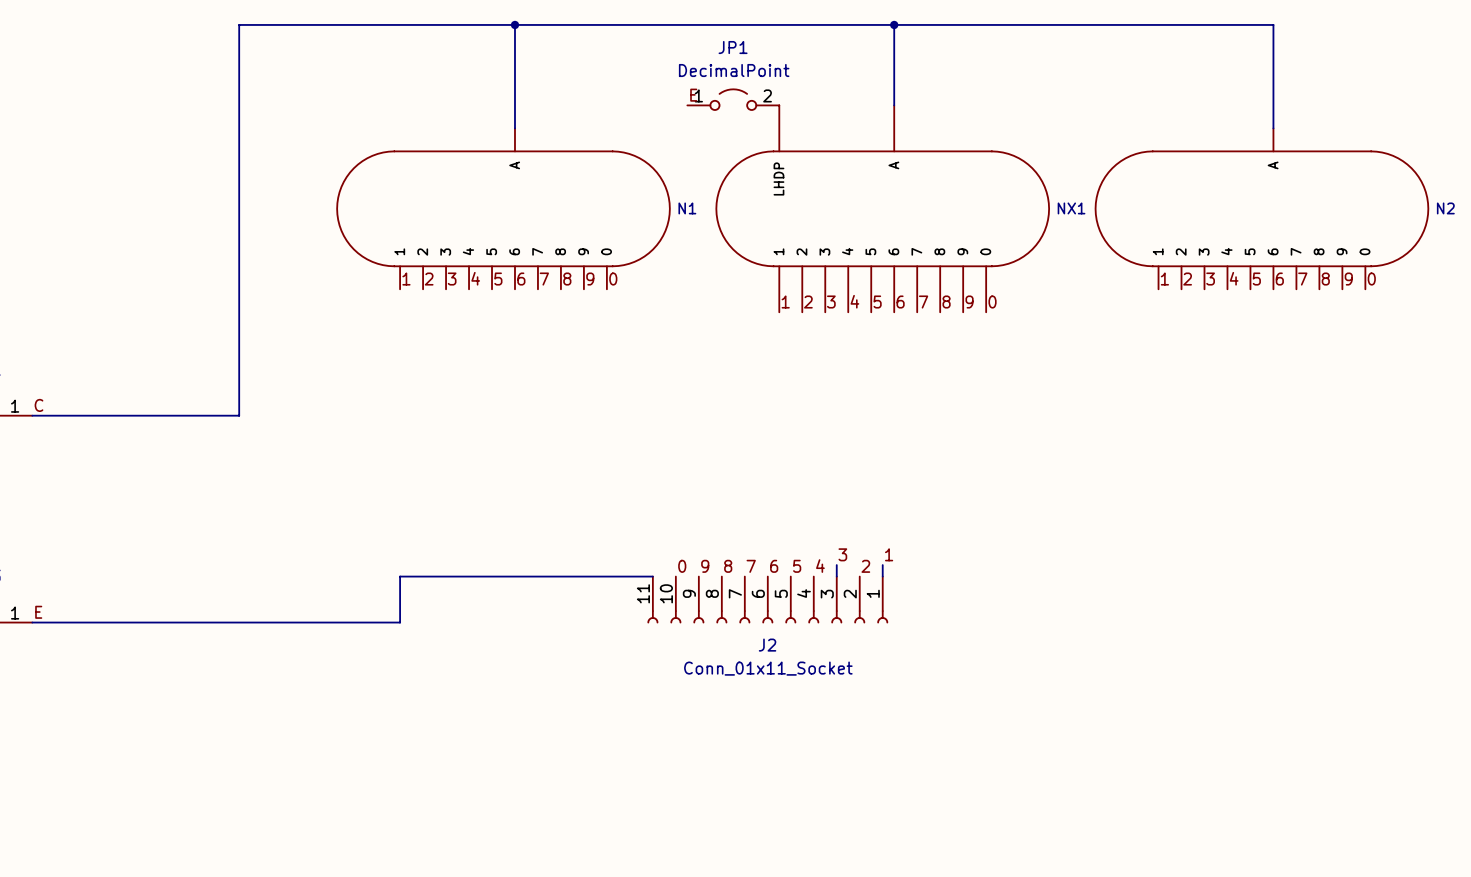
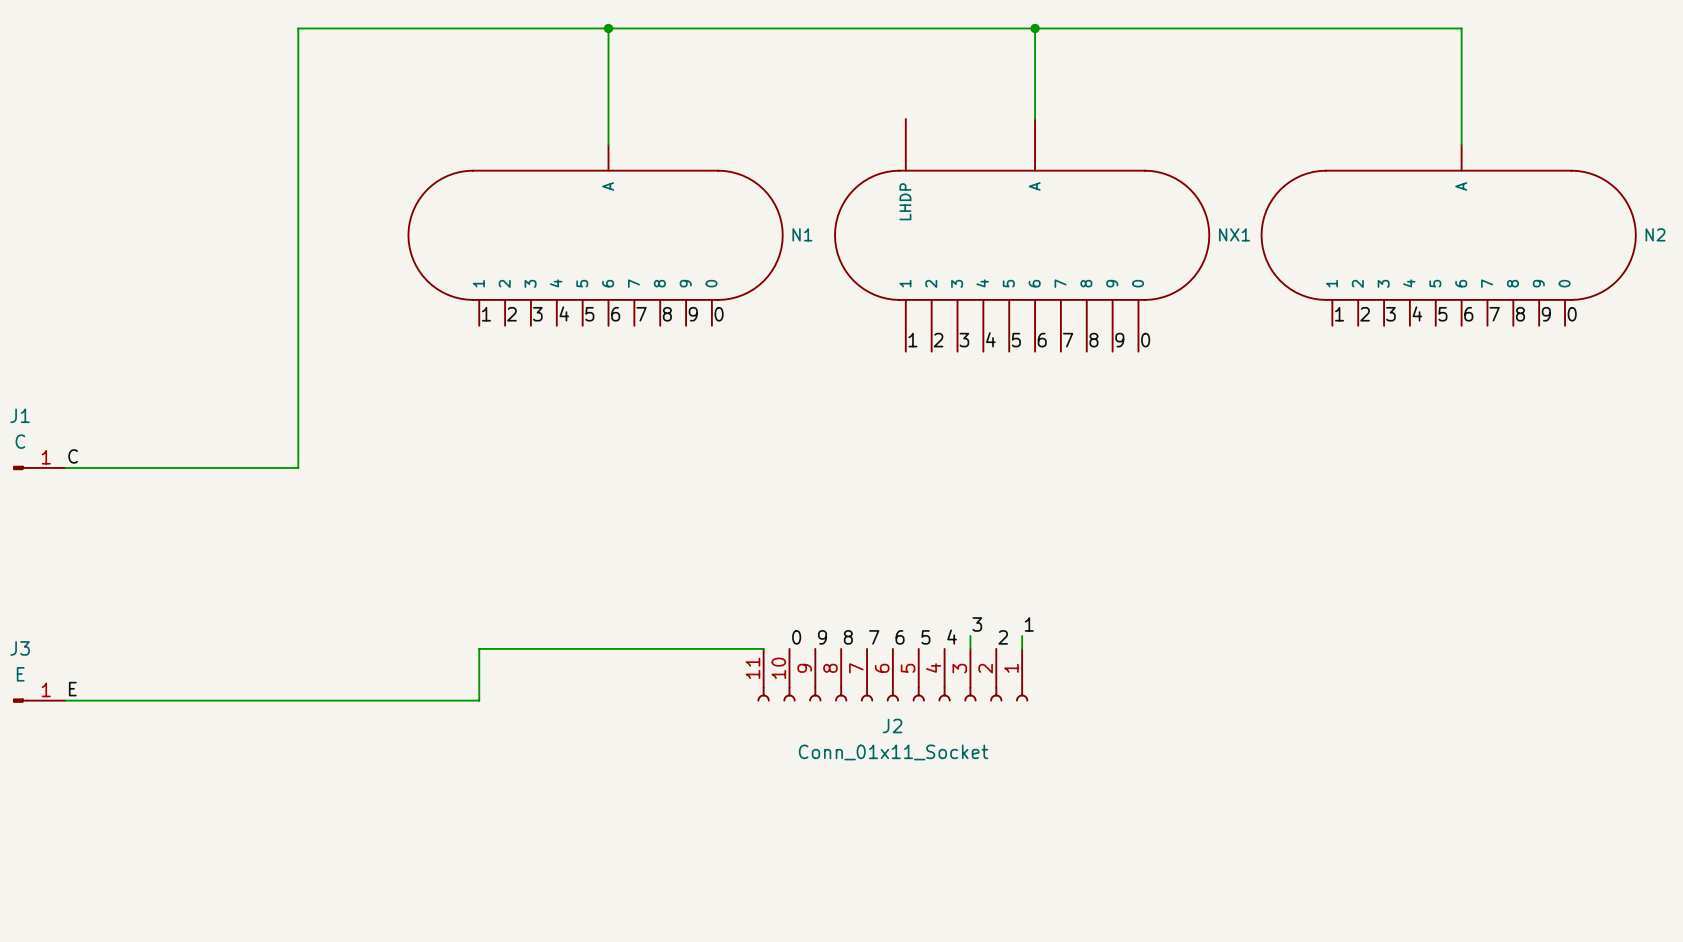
label: E (693, 95) -> none
JP1: DecimalPoint (733, 99) -> none

